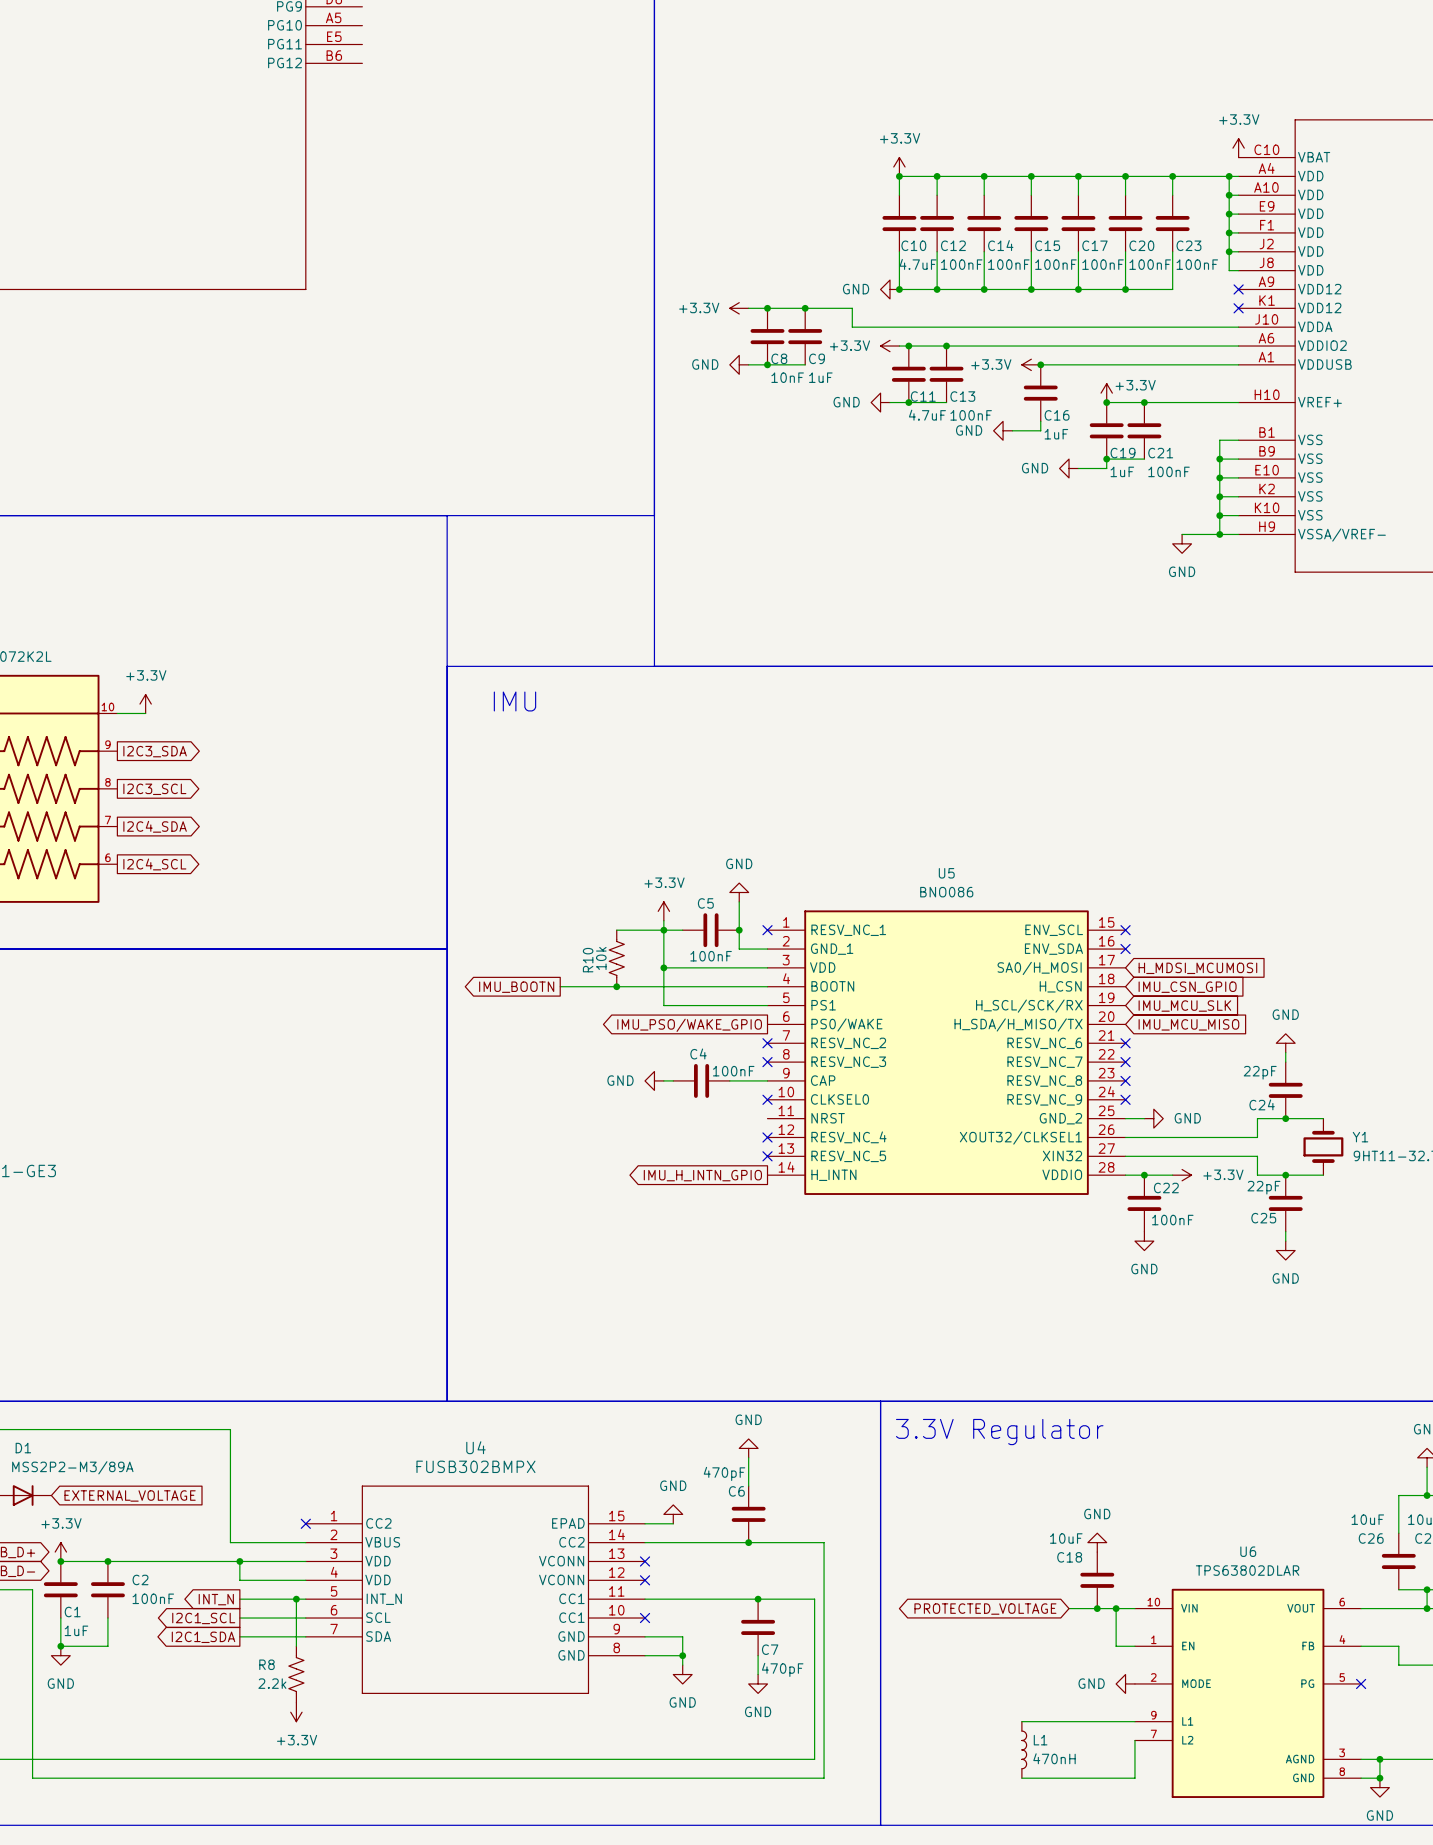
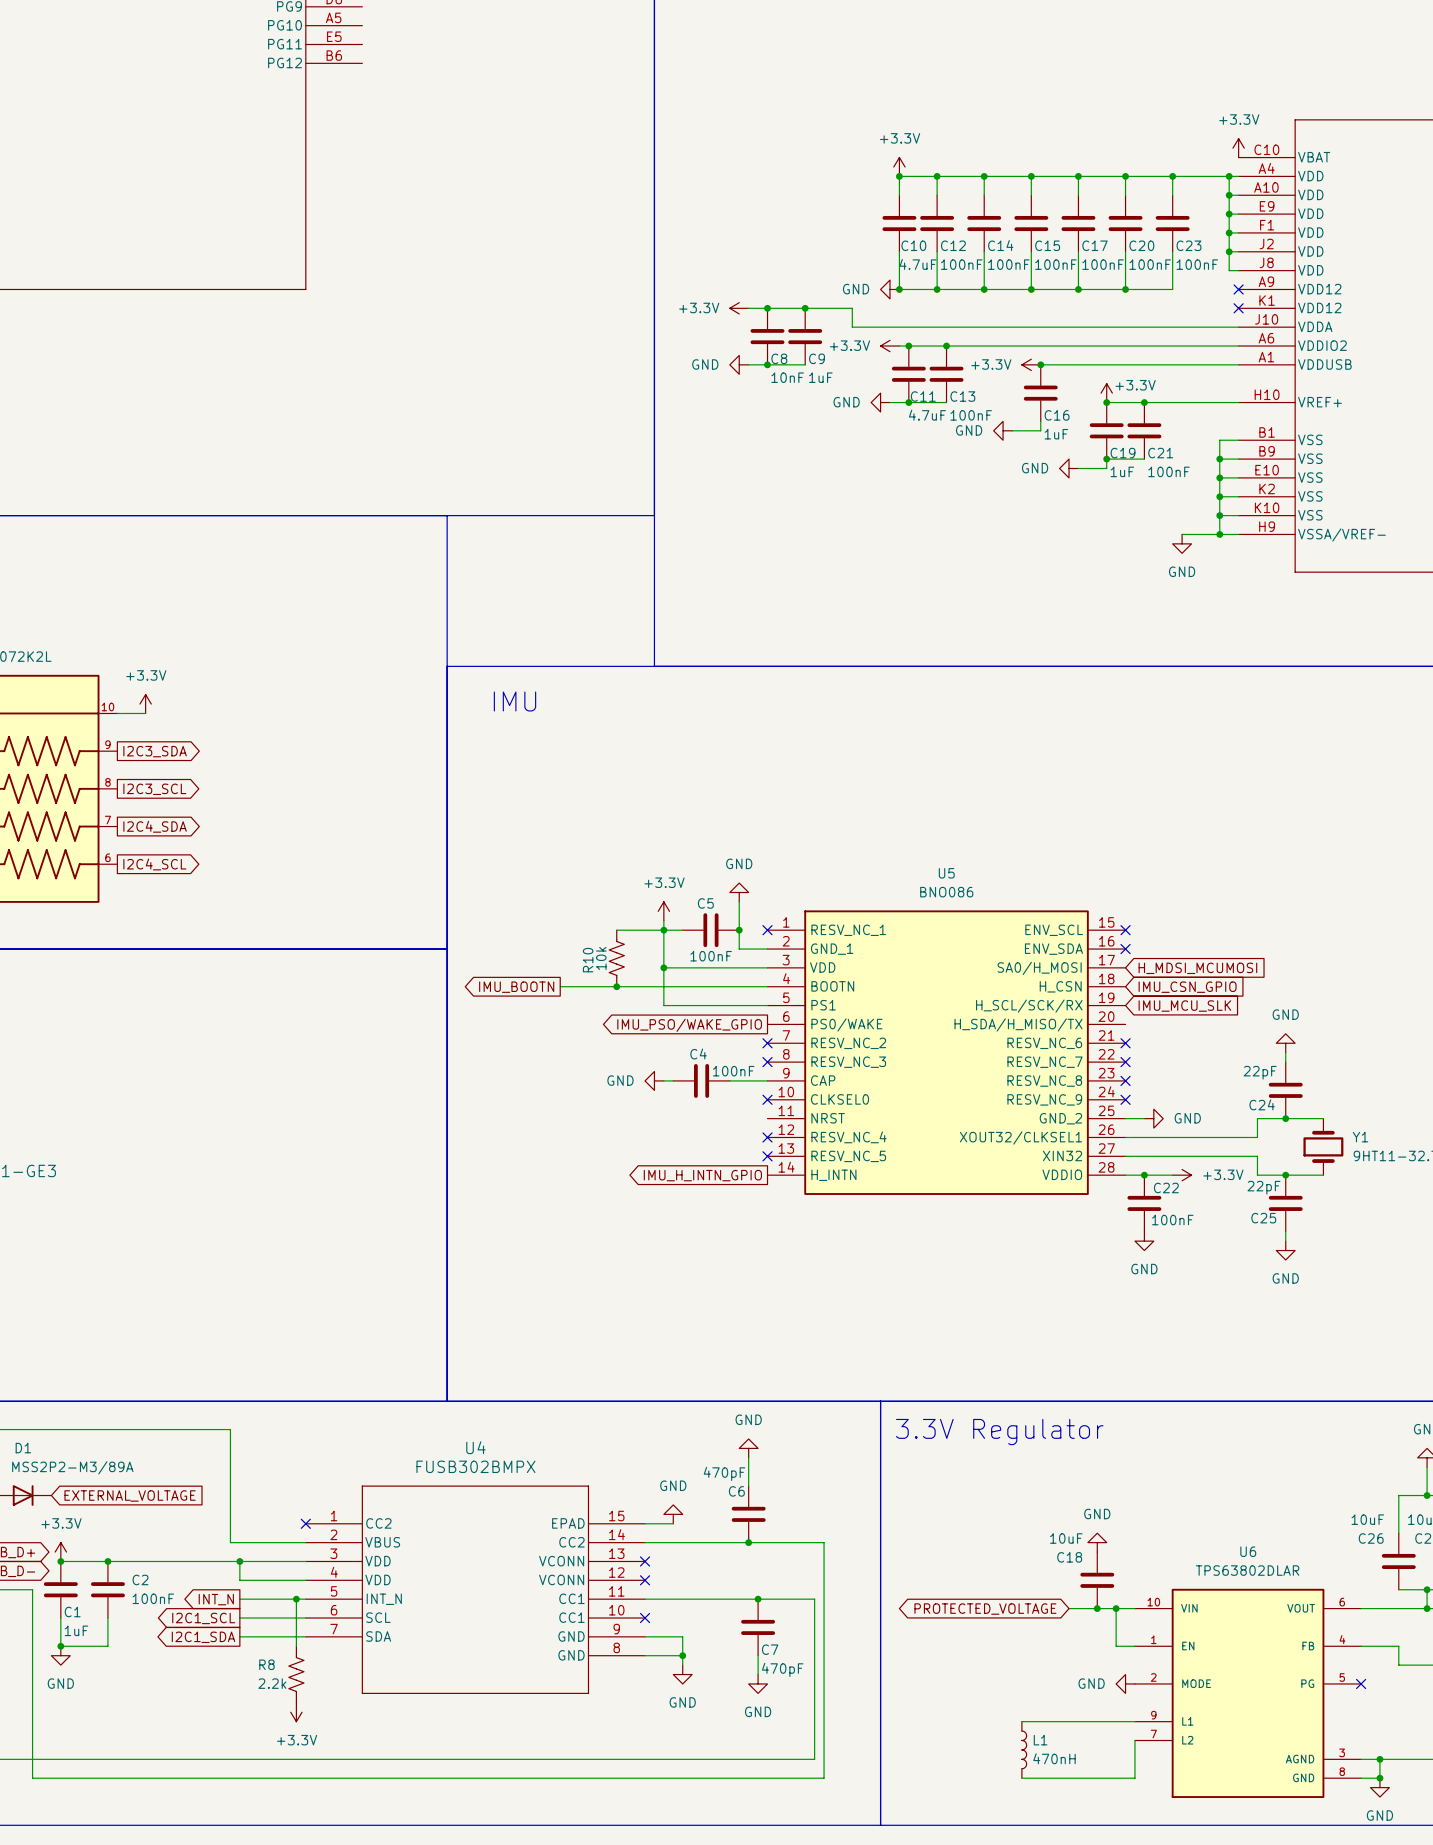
global label: IMU_MCU_MISO (1188, 1024) -> none

